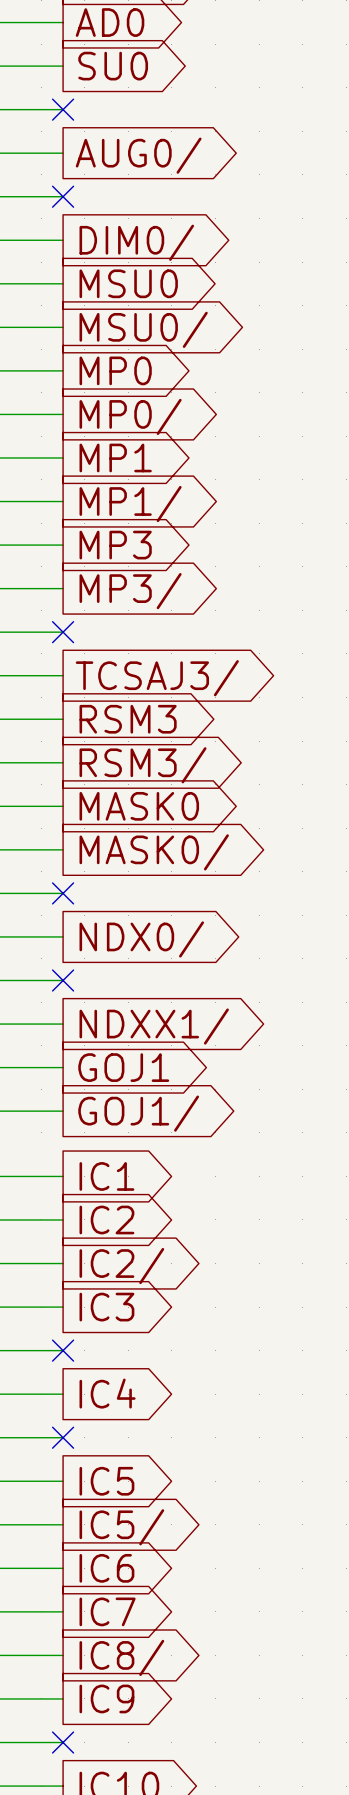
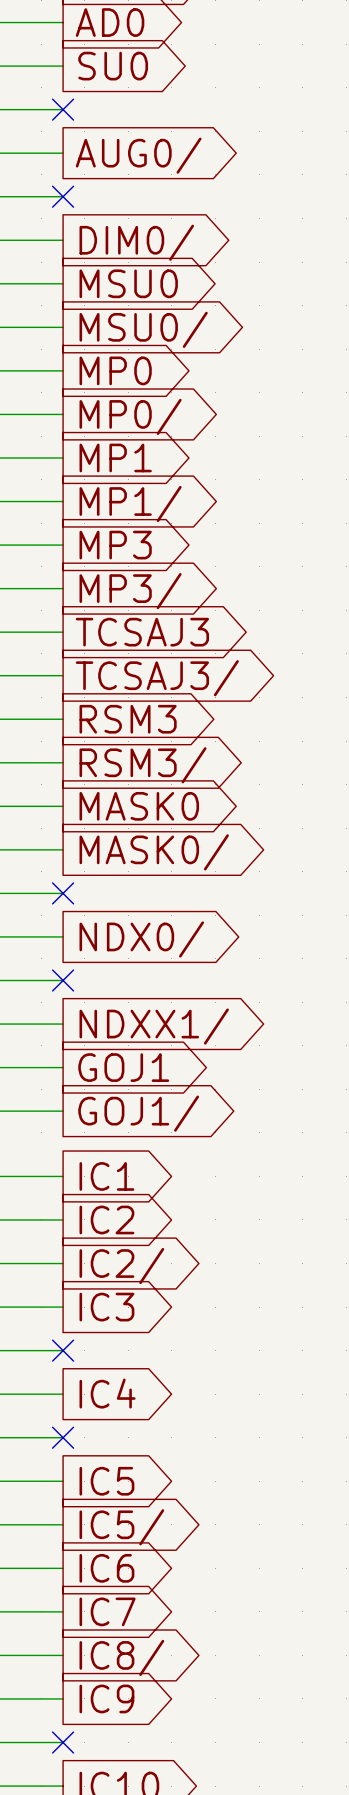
no-connect mark: (63, 632) -> none
global label: none -> TCSAJ3 (142, 632)

